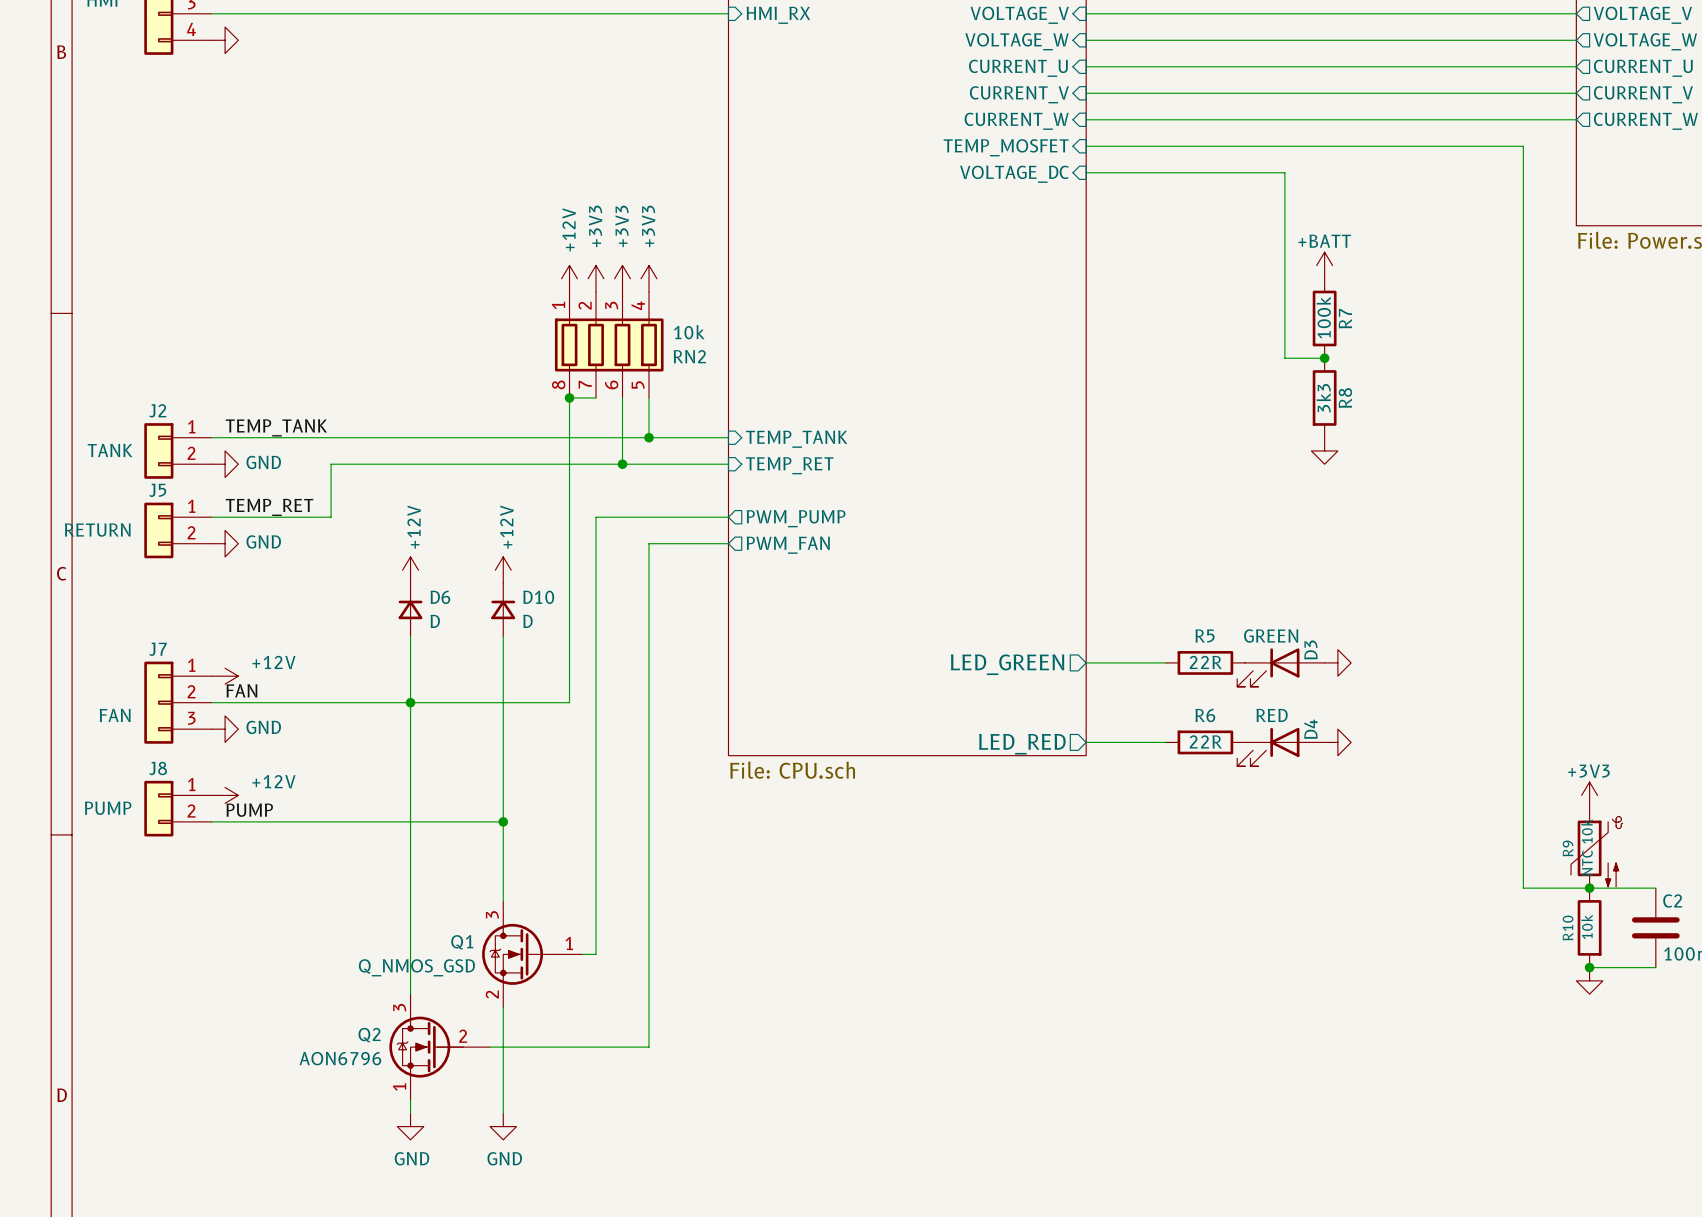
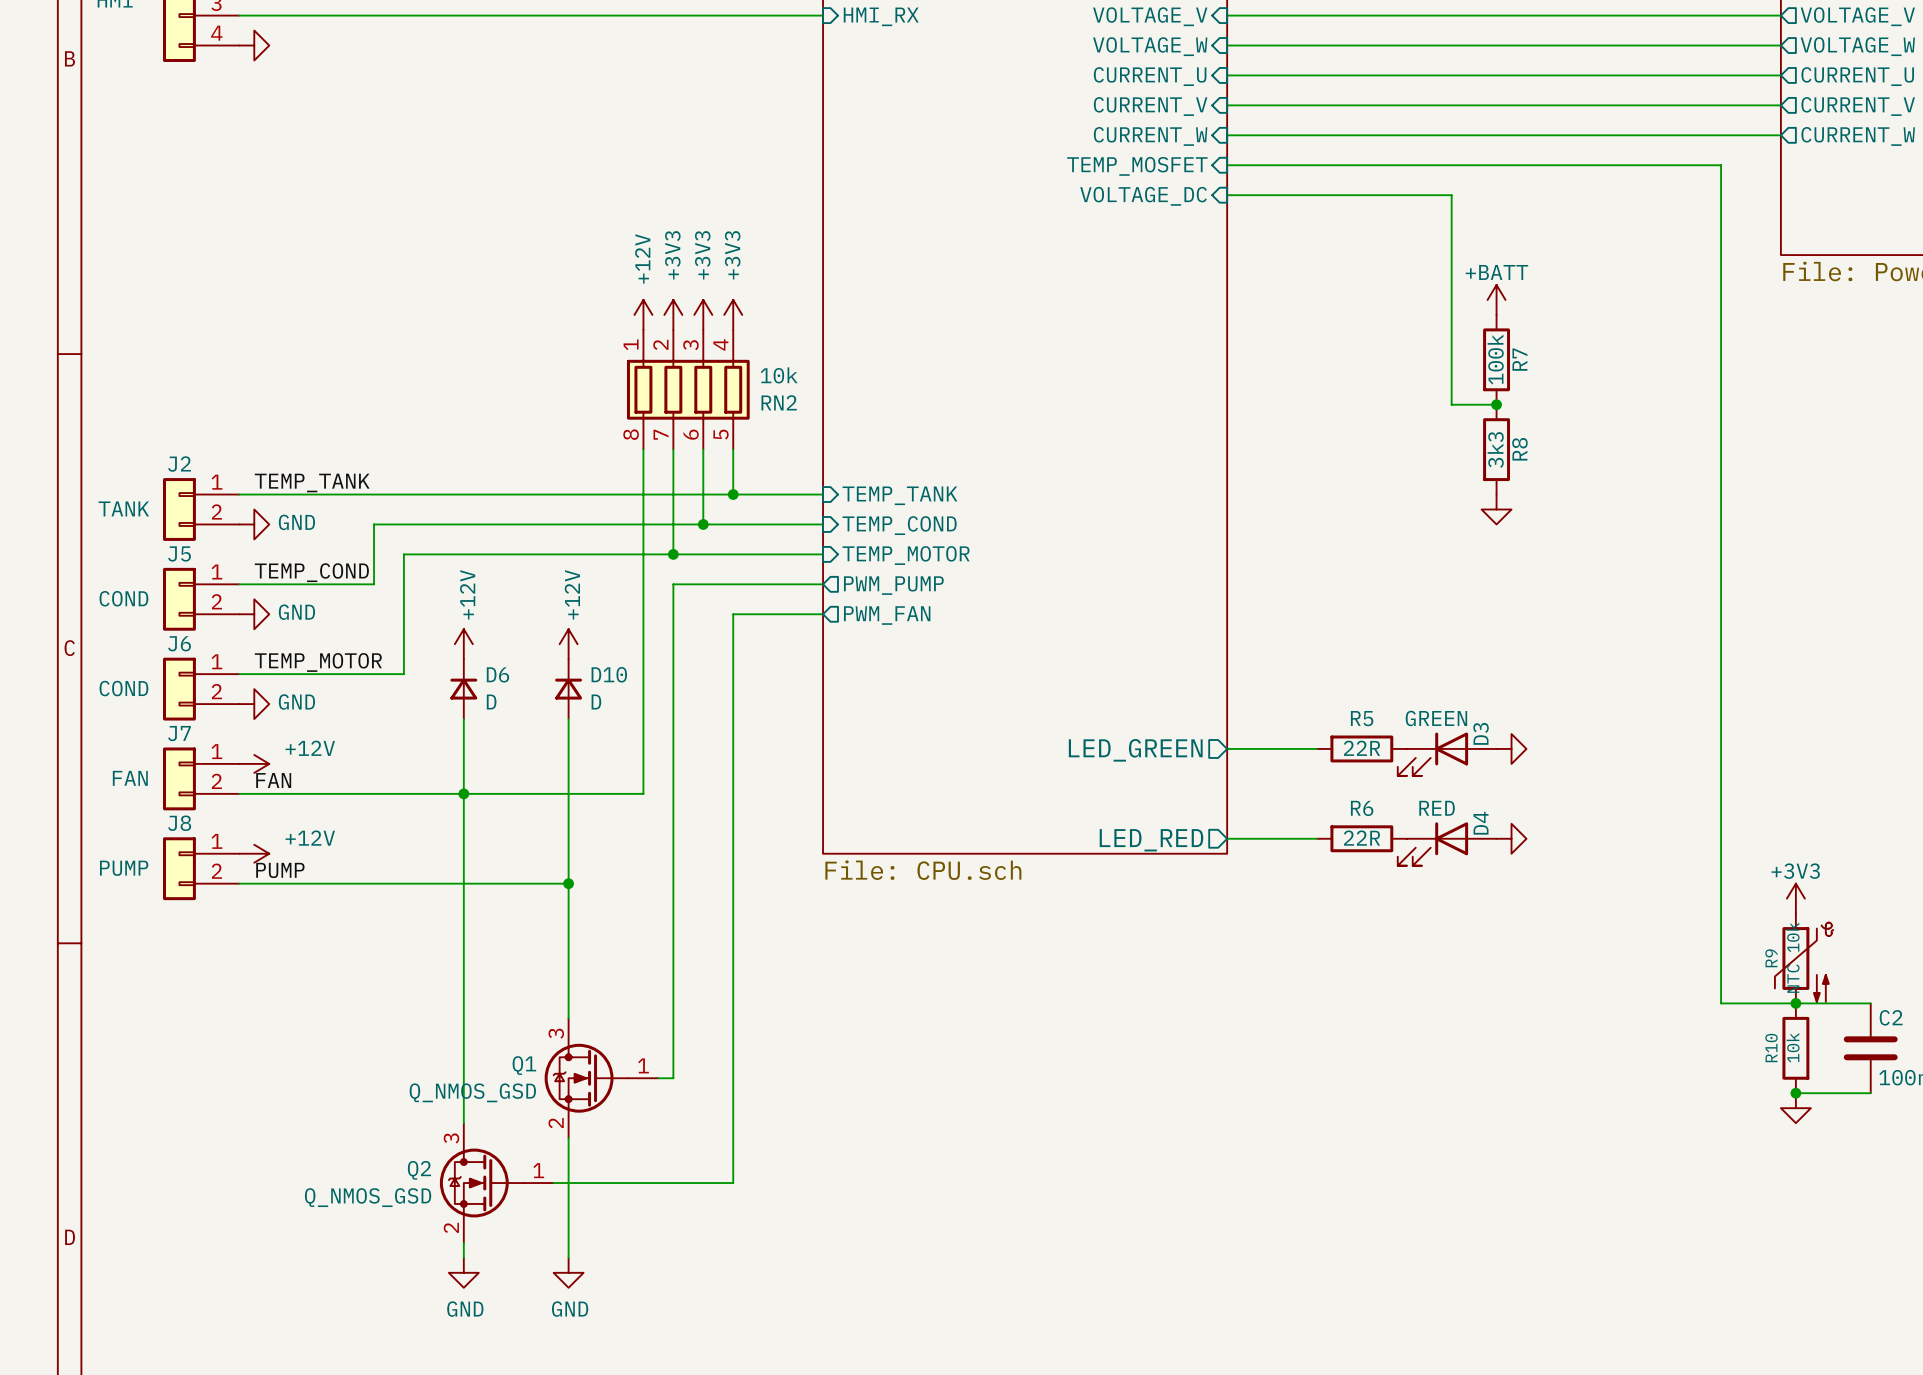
wire: (569, 397) (596, 397) -> (673, 554) (673, 449)
junction: (569, 397) -> none
sheet pin: TEMP_RET (789, 465) -> TEMP_COND (899, 525)
junction: none -> (673, 554)
wire: none -> (823, 554) (403, 554) (403, 674) (239, 674)
sheet pin: none -> TEMP_MOTOR (906, 555)
label: TEMP_RET (269, 507) -> TEMP_COND (311, 572)
J5 value: RETURN (97, 530) -> COND (123, 598)
label: none -> TEMP_MOTOR (318, 662)
J6: none -> COND (201, 689)
J7 symbol: [144, 661, 212, 744] -> [162, 747, 240, 811]
power symbol position: GND (225, 729) -> GND (254, 704)
power symbol position: +12V (225, 795) -> +12V (254, 853)
J8 position: (178, 808) -> (201, 868)
label position: PUMP (249, 810) -> PUMP (280, 870)
wire: (211, 821) (503, 821) -> (239, 883) (568, 883)
junction position: (503, 821) -> (568, 883)
Q2 symbol: [389, 994, 491, 1101] -> [439, 1123, 554, 1243]
Q2 value: AON6796 (340, 1058) -> Q_NMOS_GSD (368, 1197)

